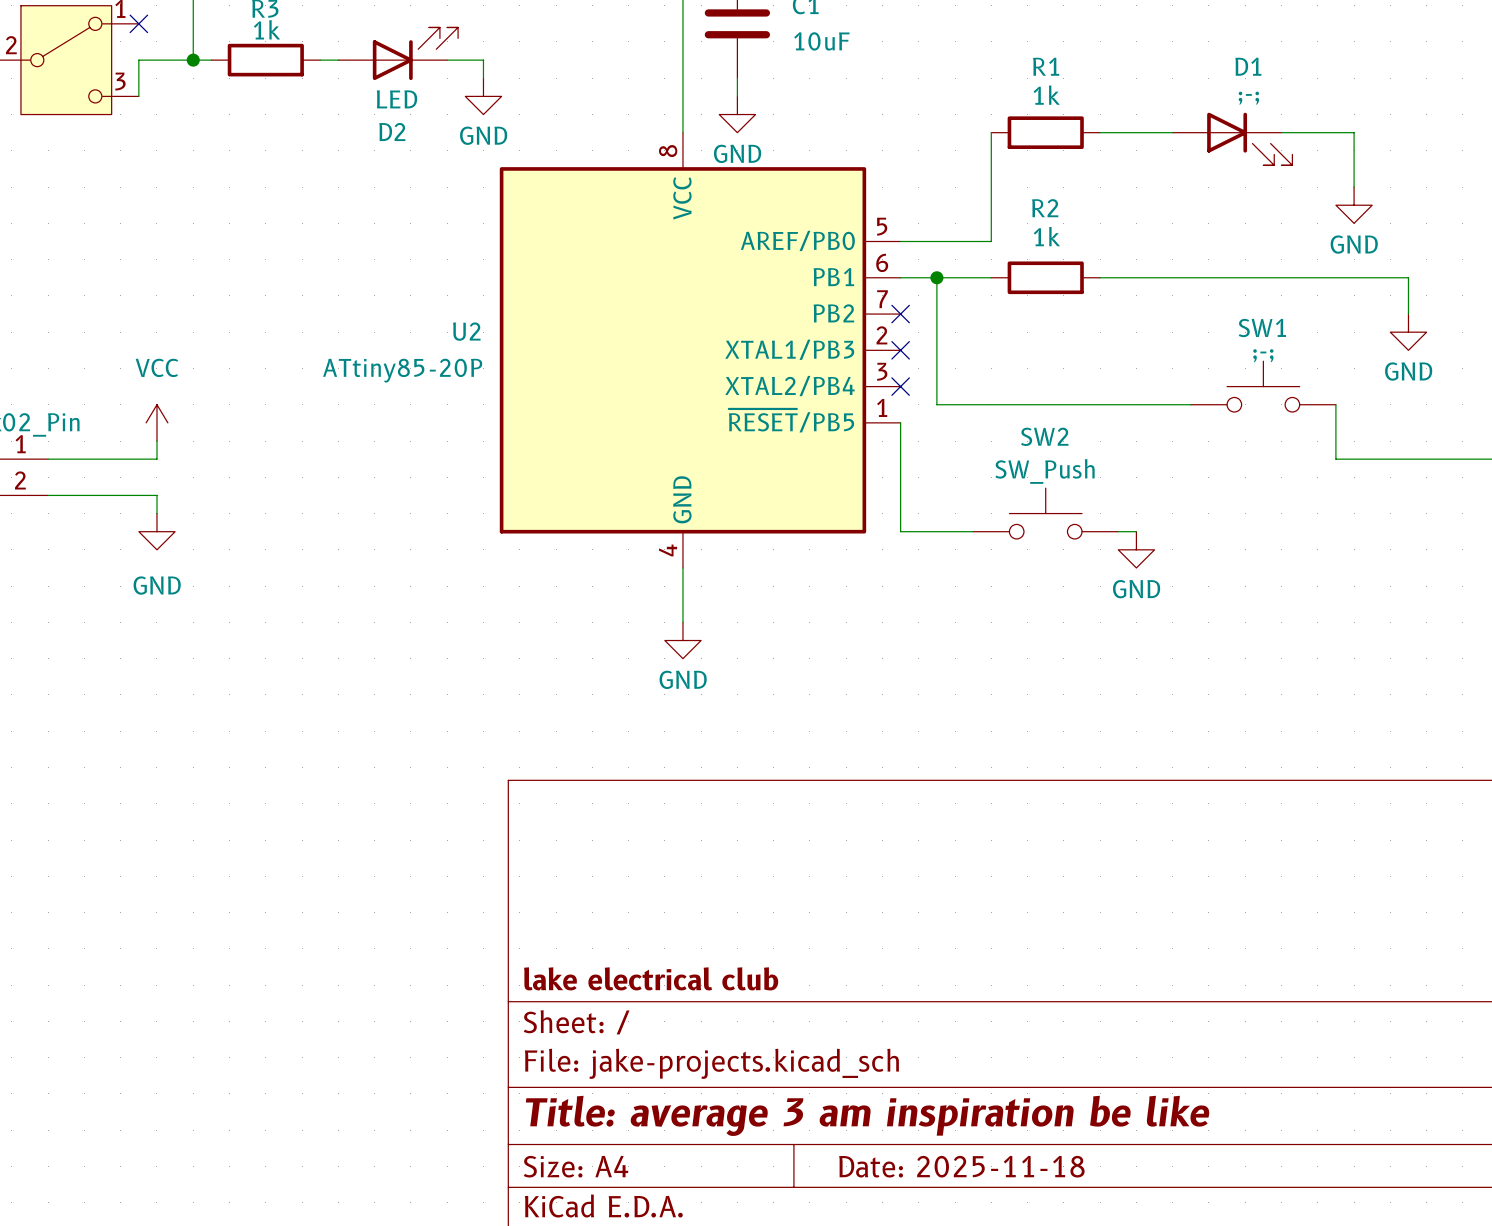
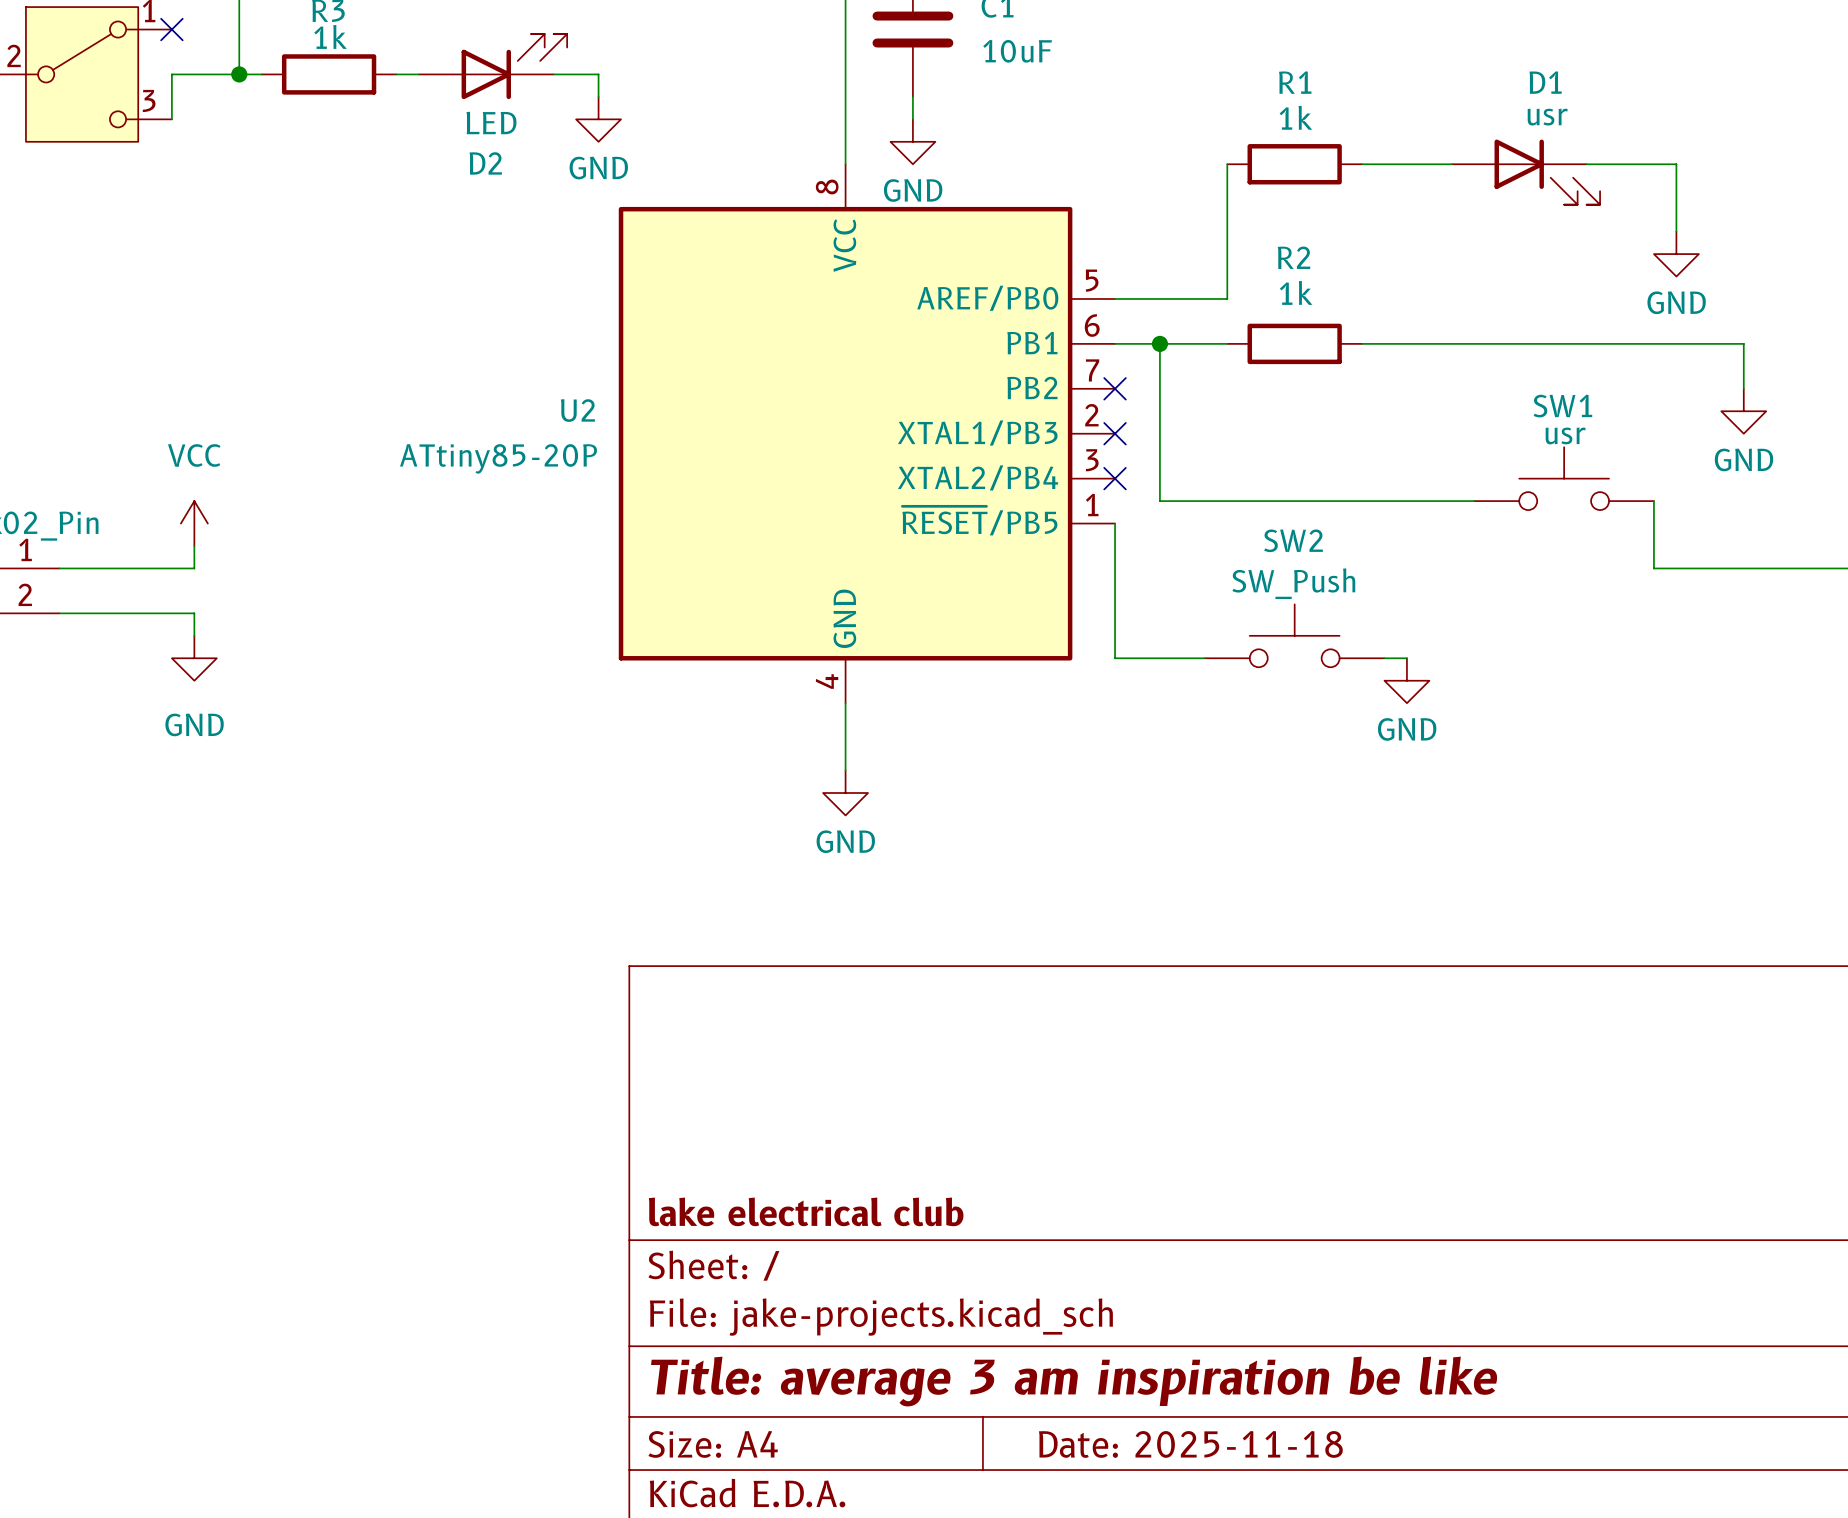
D1 value: ;-; (1248, 98) -> usr (1547, 117)
SW1 value: ;-; (1263, 355) -> usr (1565, 435)

